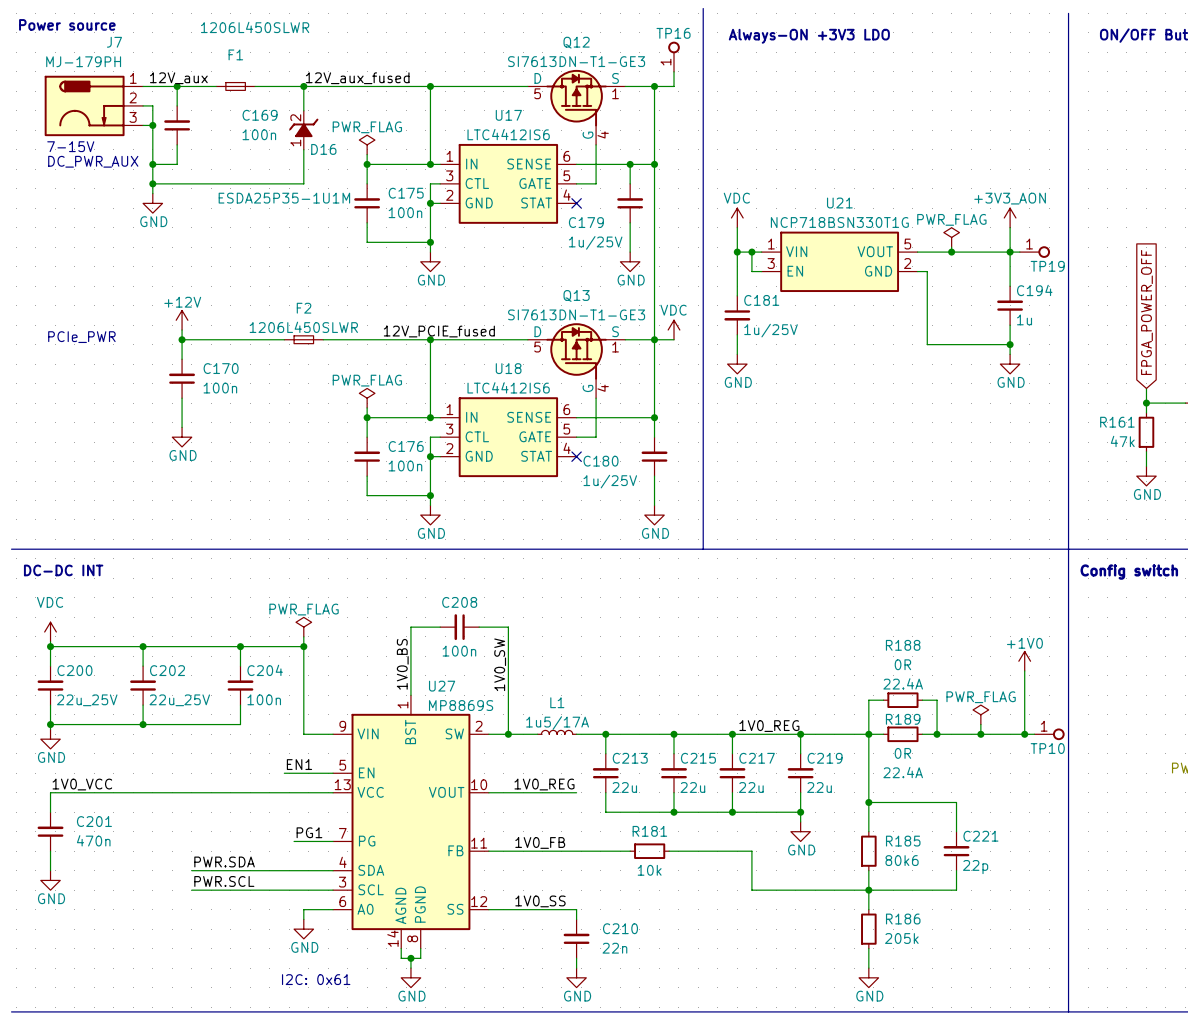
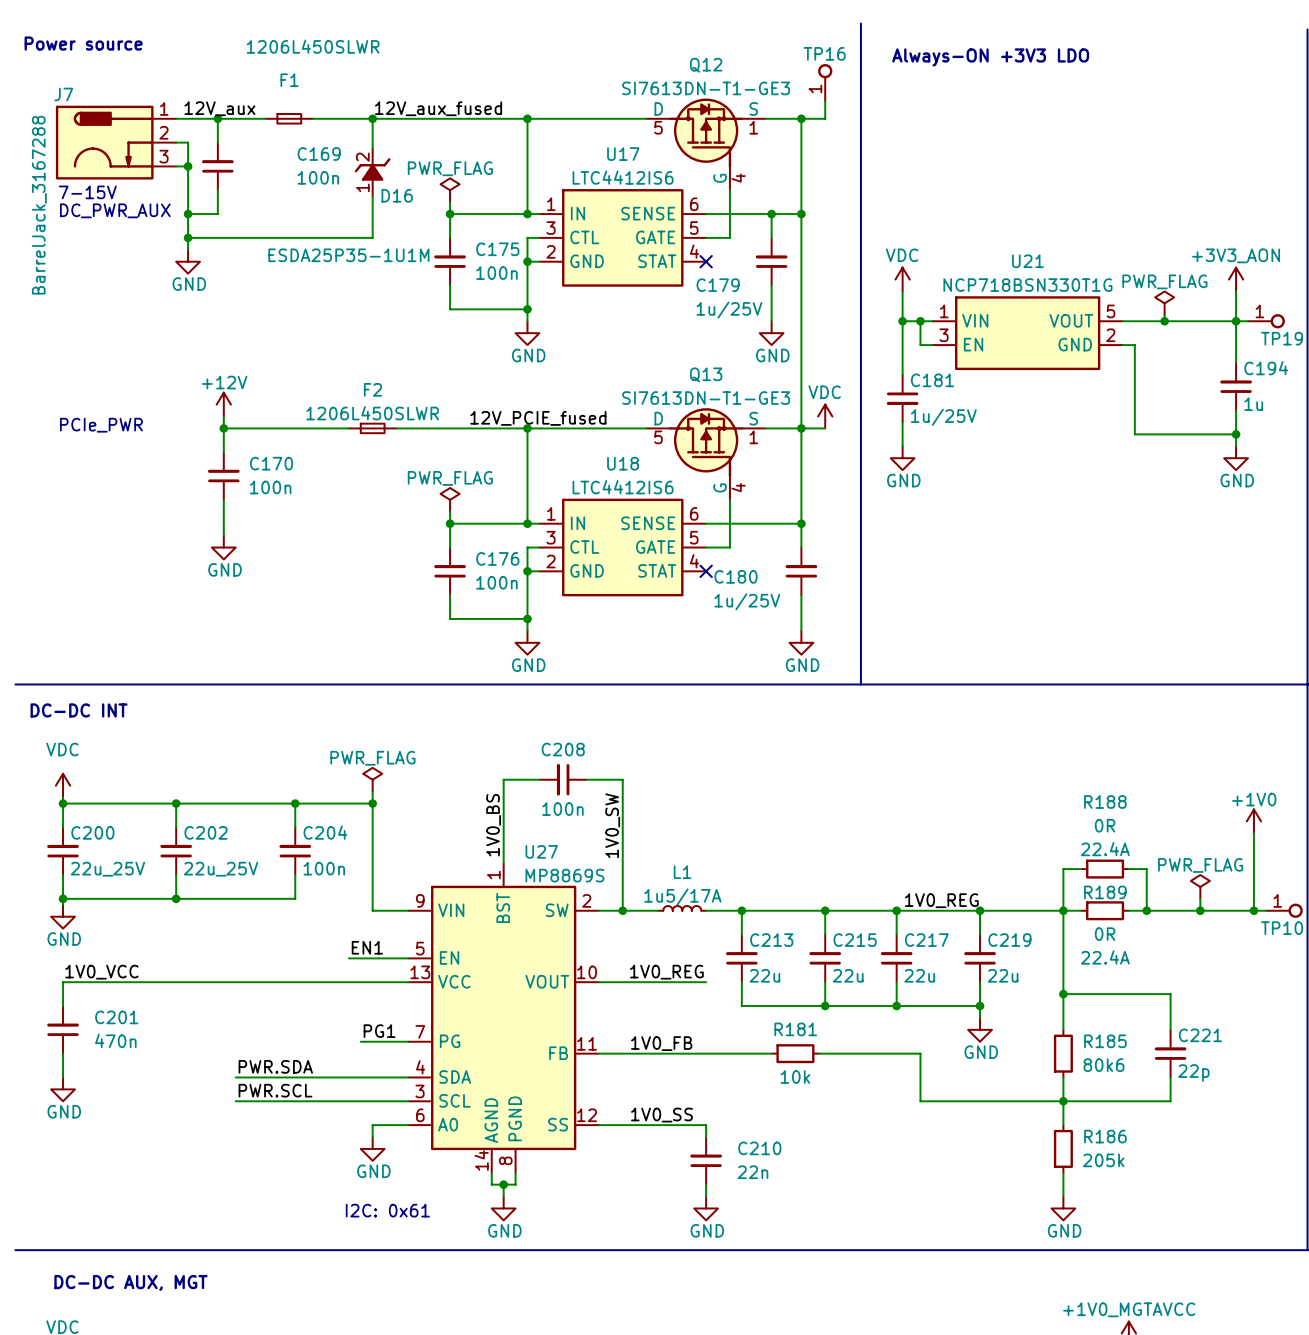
J7 name position: J7 (114, 42) -> J7 (63, 94)
J7 text: MJ-179PH (83, 61) -> none
J7 value: none -> BarrelJack_3167288 (39, 205)

